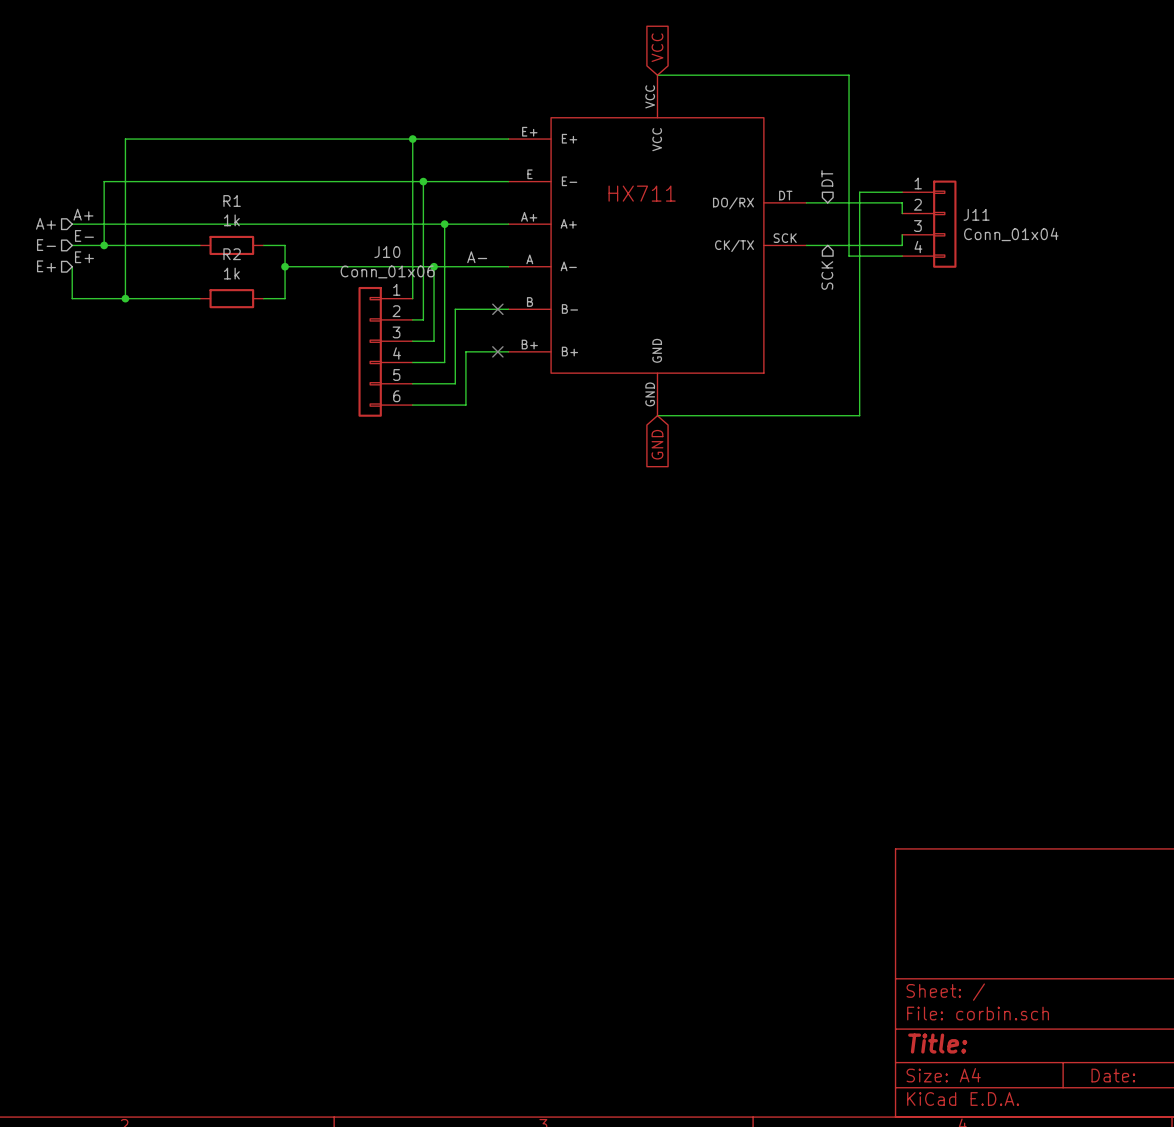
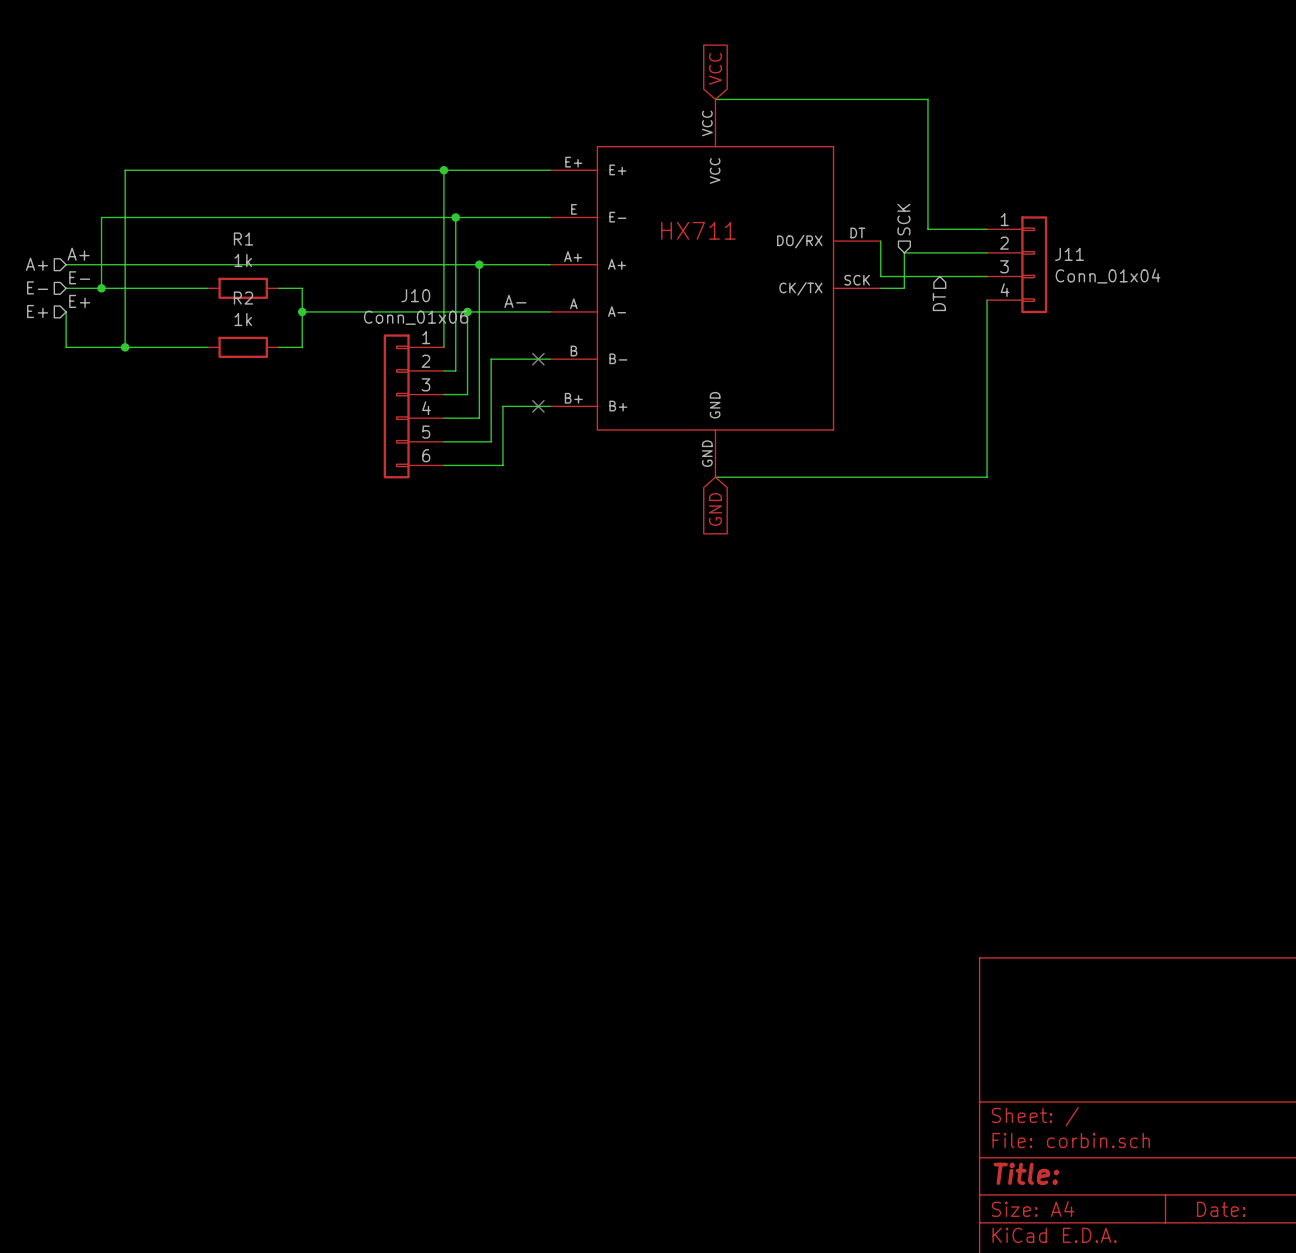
hierarchical label rotation: 0° (827, 178) -> 180° (939, 302)
hierarchical label position: DT (827, 178) -> DT (939, 302)
wire: (849, 192) (849, 256) (902, 256) -> (927, 229) (939, 229)
wire: (859, 192) (859, 415) -> (987, 300) (987, 477) (939, 477)
wire: (806, 202) (902, 202) (902, 213) -> (880, 241) (880, 276) (987, 276)
wire: (902, 234) (902, 245) (827, 245) -> (987, 252) (904, 252) (904, 288)
hierarchical label rotation: 0° (827, 275) -> 180° (903, 219)
hierarchical label position: SCK (827, 275) -> SCK (903, 219)

